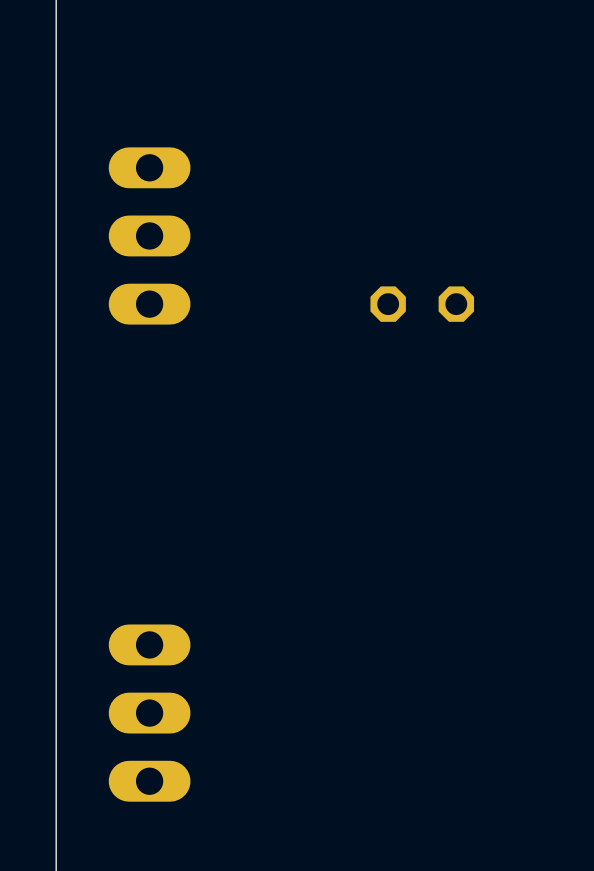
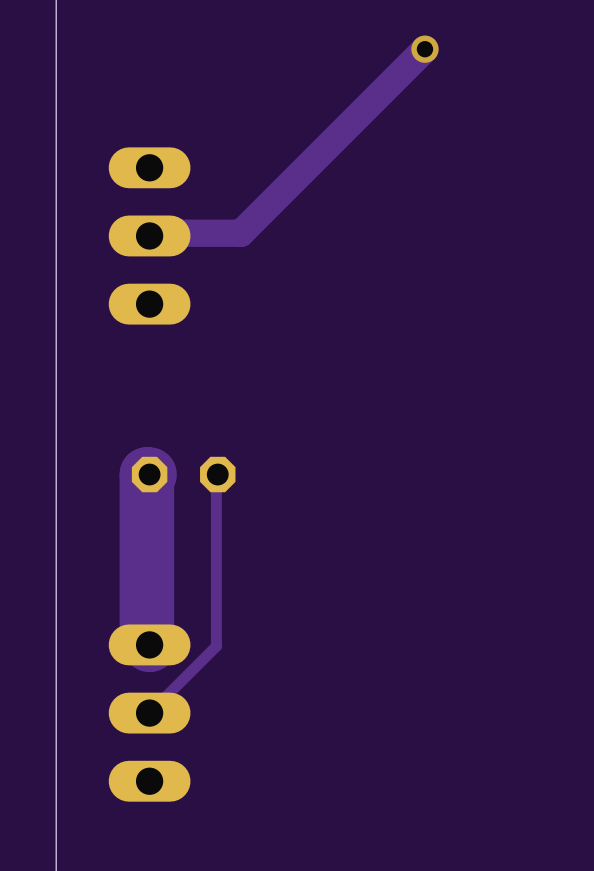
track: none -> (424, 49) (240, 233) (150, 233) (149, 235)
via: none -> (424, 49)
part position: (422, 304) -> (183, 474)
track: none -> (149, 474) (146, 474) (146, 642) (149, 644)
track: none -> (217, 474) (216, 646) (149, 713)

